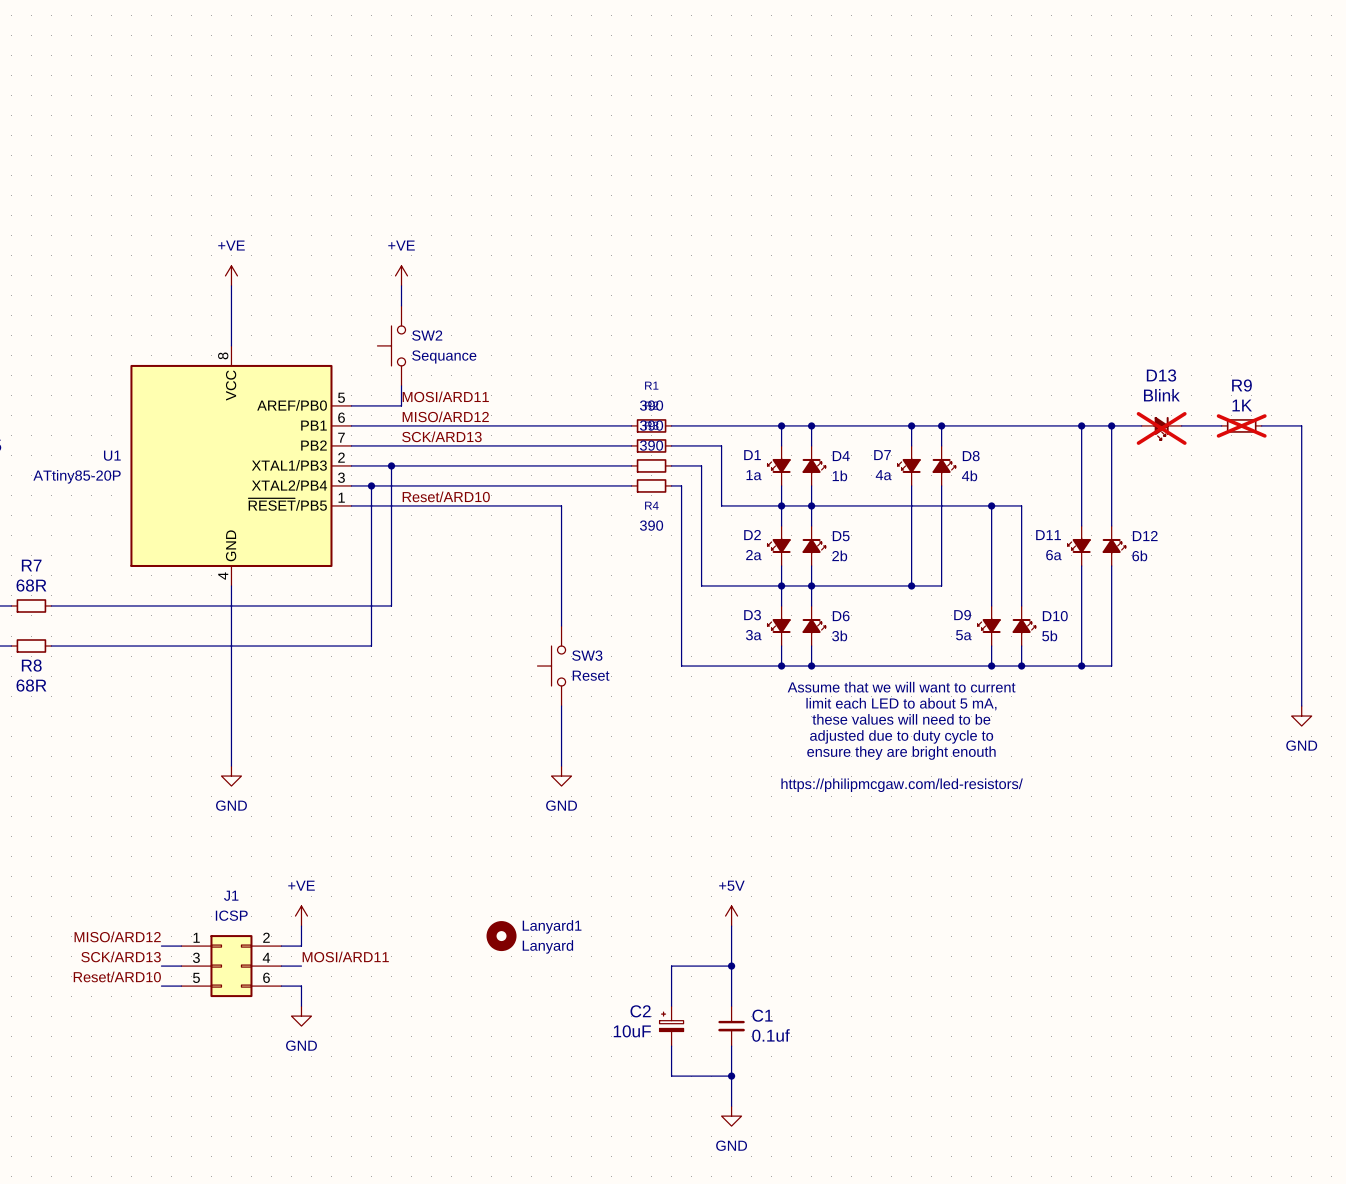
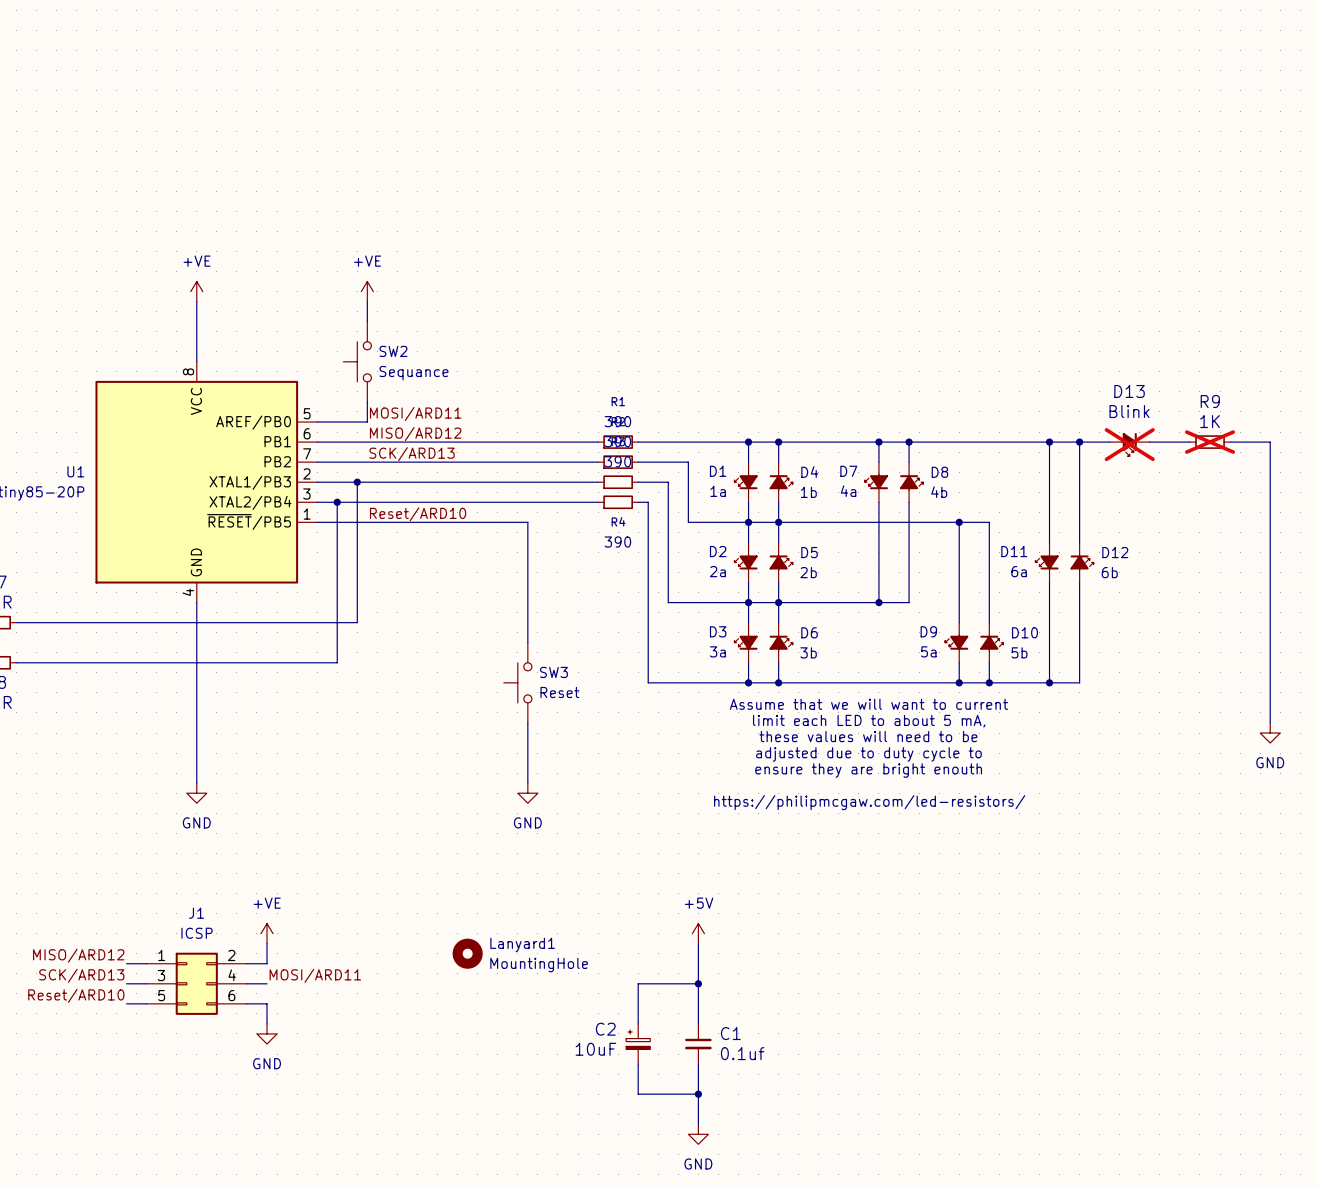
Lanyard1 value: Lanyard (547, 946) -> MountingHole (539, 965)

